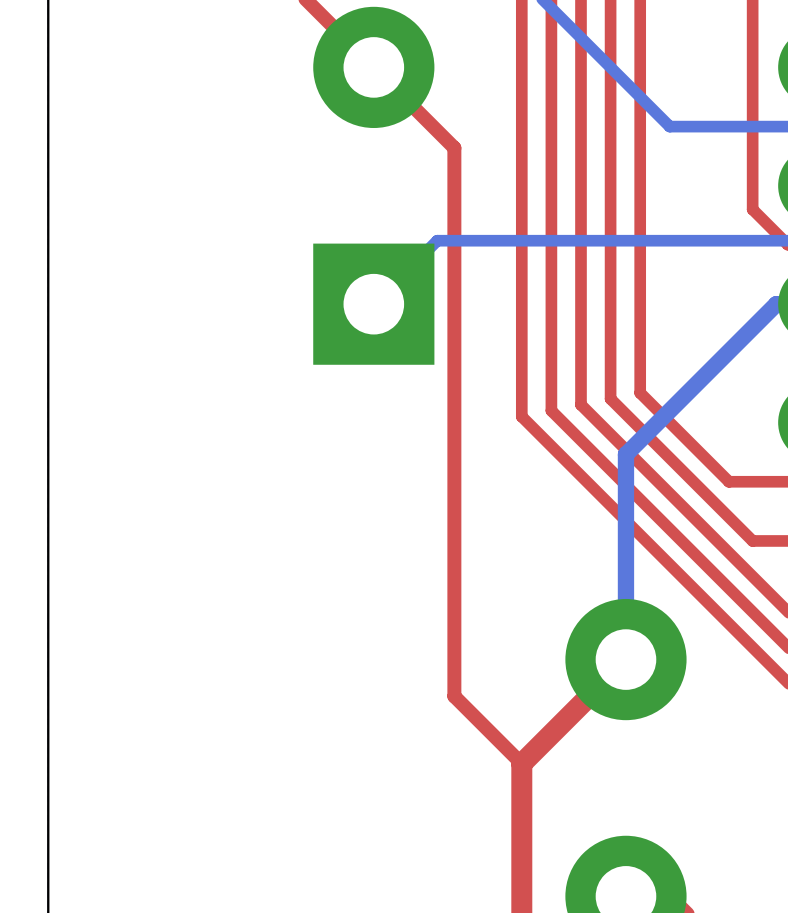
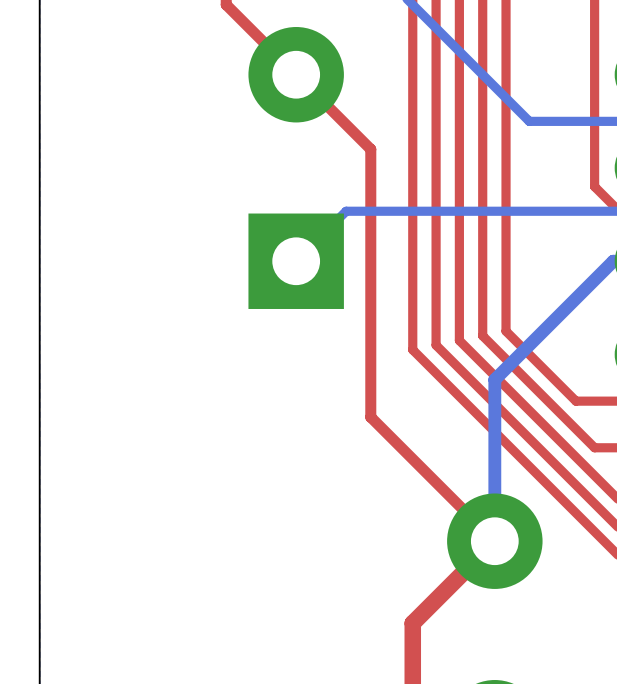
top track: (454, 147) (454, 696) (521, 763) -> (359, 138) (370, 149) (370, 417) (494, 541)

